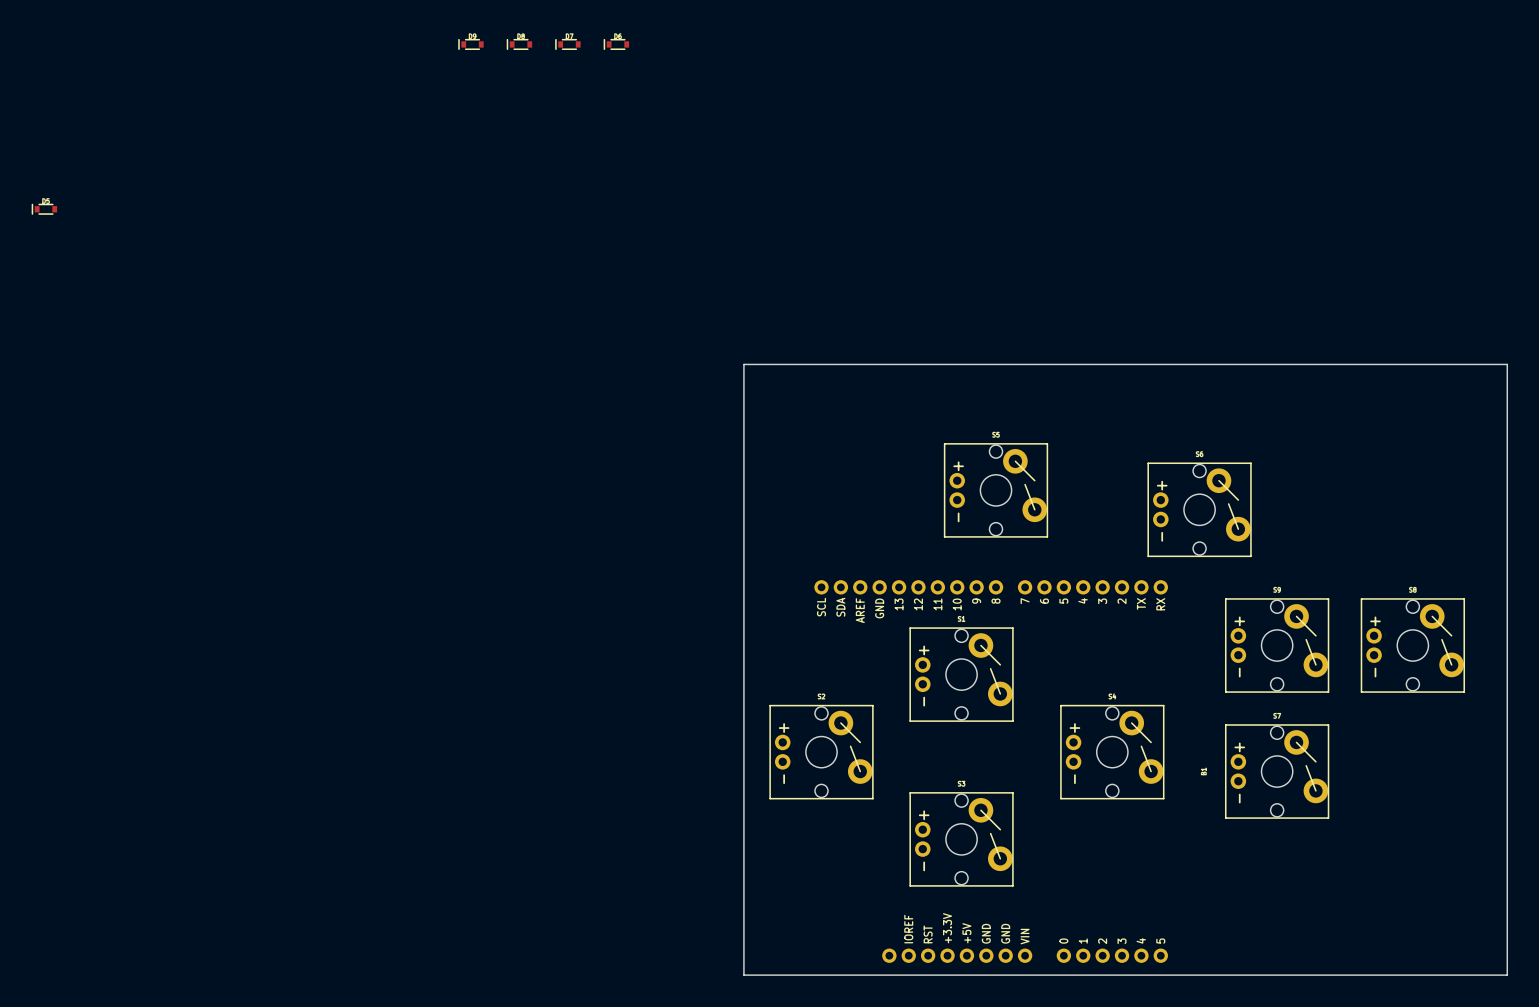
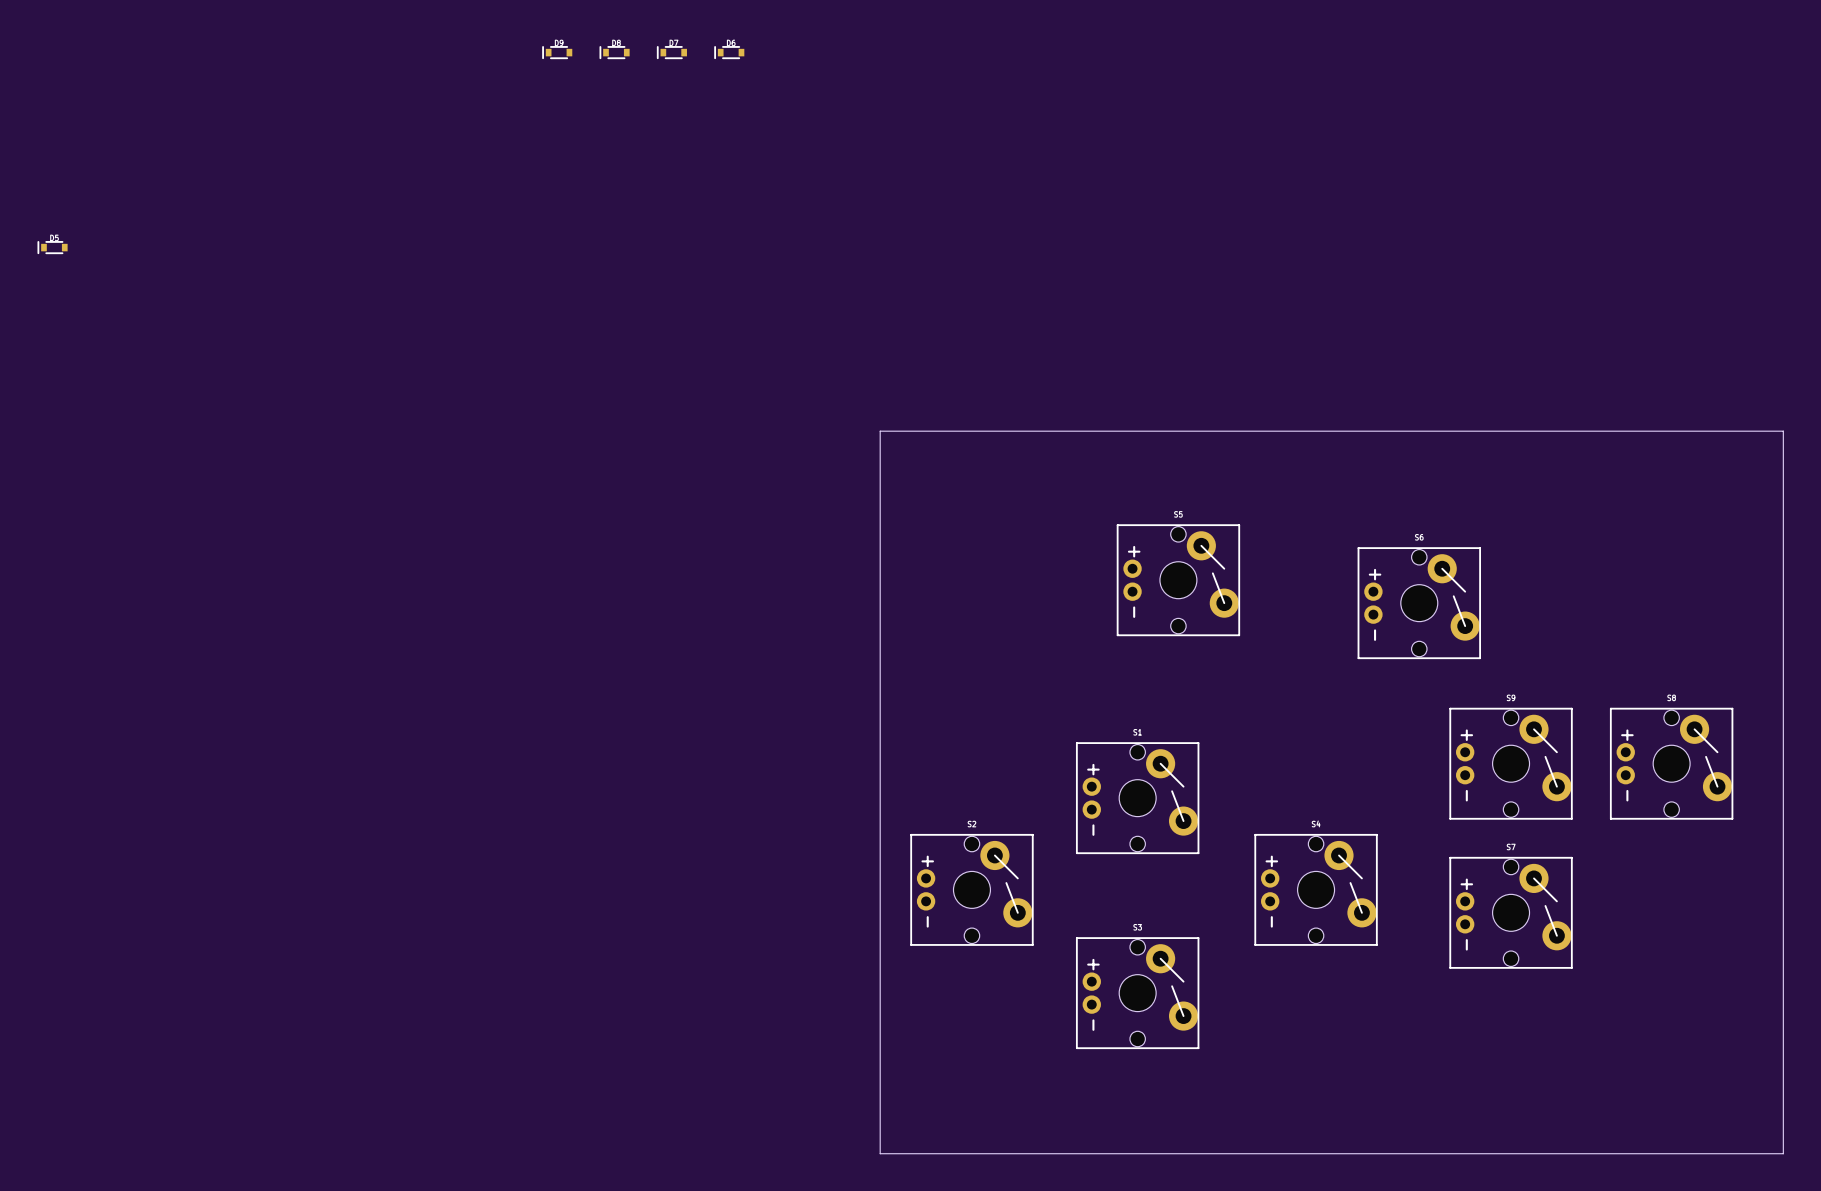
part: (991, 771) -> none

